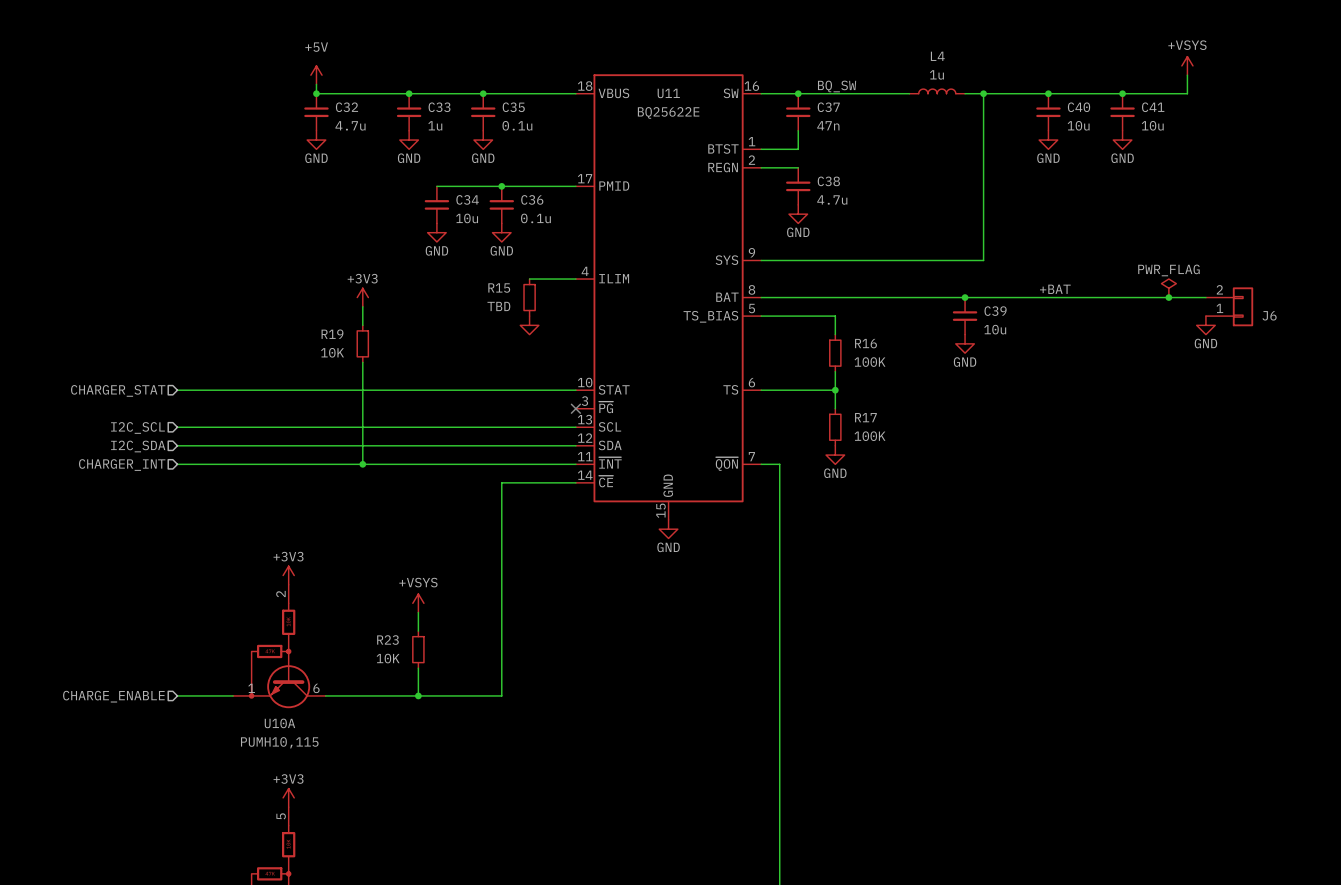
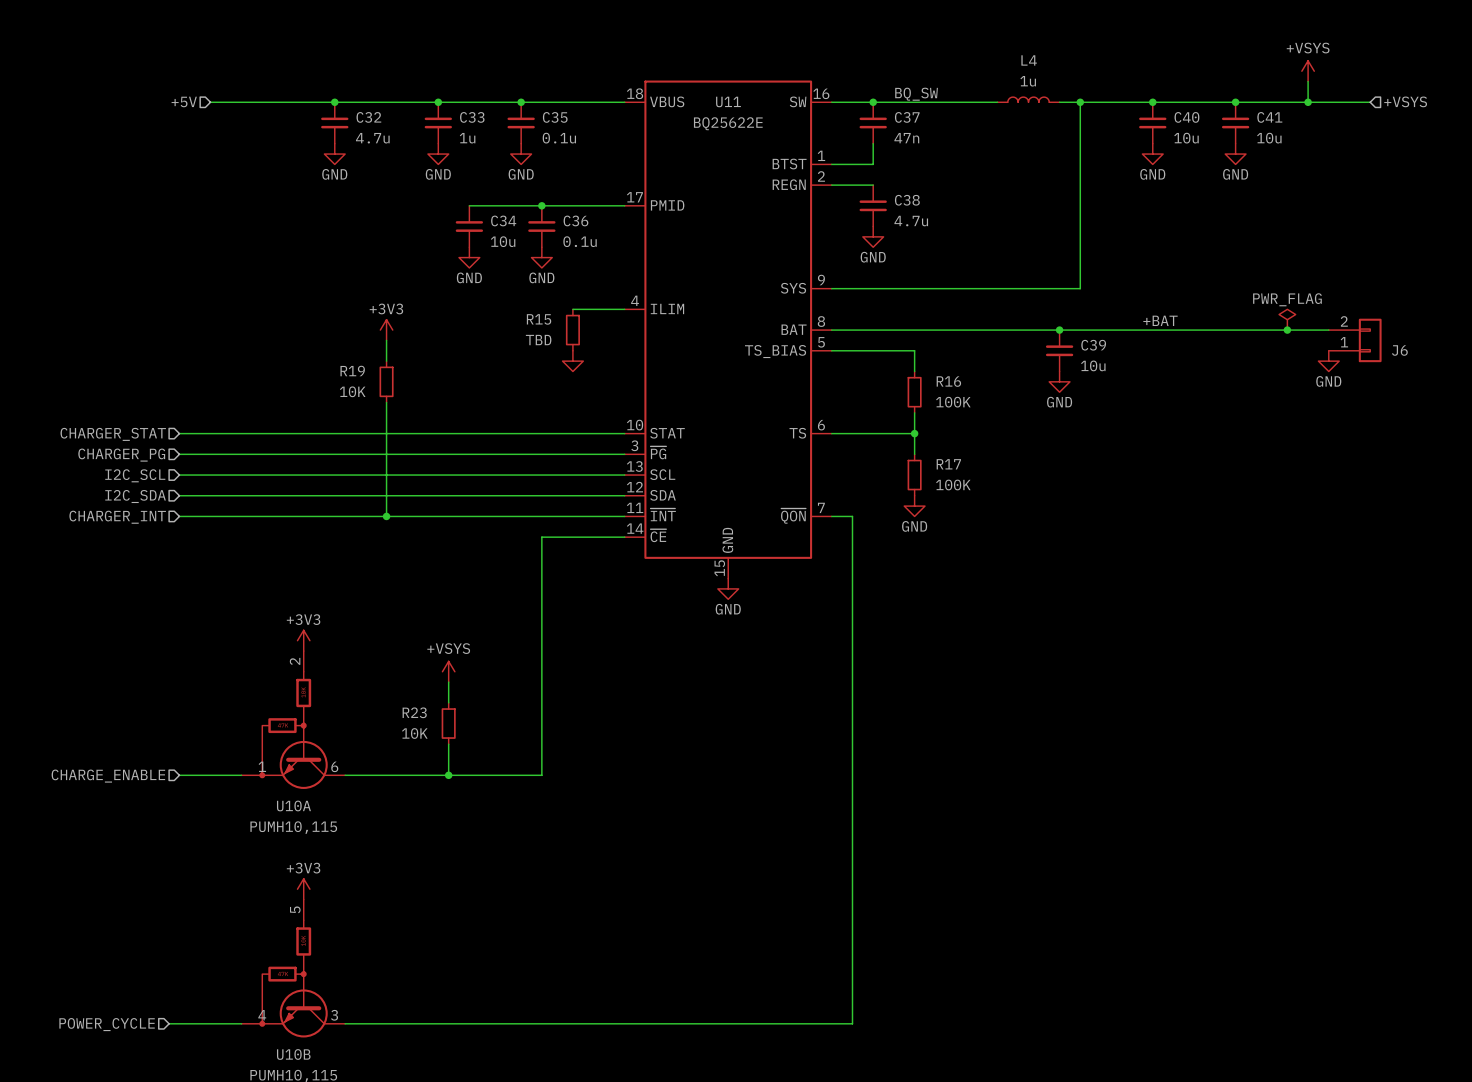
power symbol: +5V (316, 75) -> none
wire: (316, 84) (316, 93) -> (210, 102) (334, 102)
hierarchical label: none -> +5V (184, 101)
wire: none -> (1308, 102) (1370, 102)
junction: none -> (1308, 102)
hierarchical label: none -> +VSYS (1405, 101)
wire: none -> (179, 454) (624, 454)
no-connect mark: (575, 408) -> none
hierarchical label: none -> CHARGER_PG (121, 455)

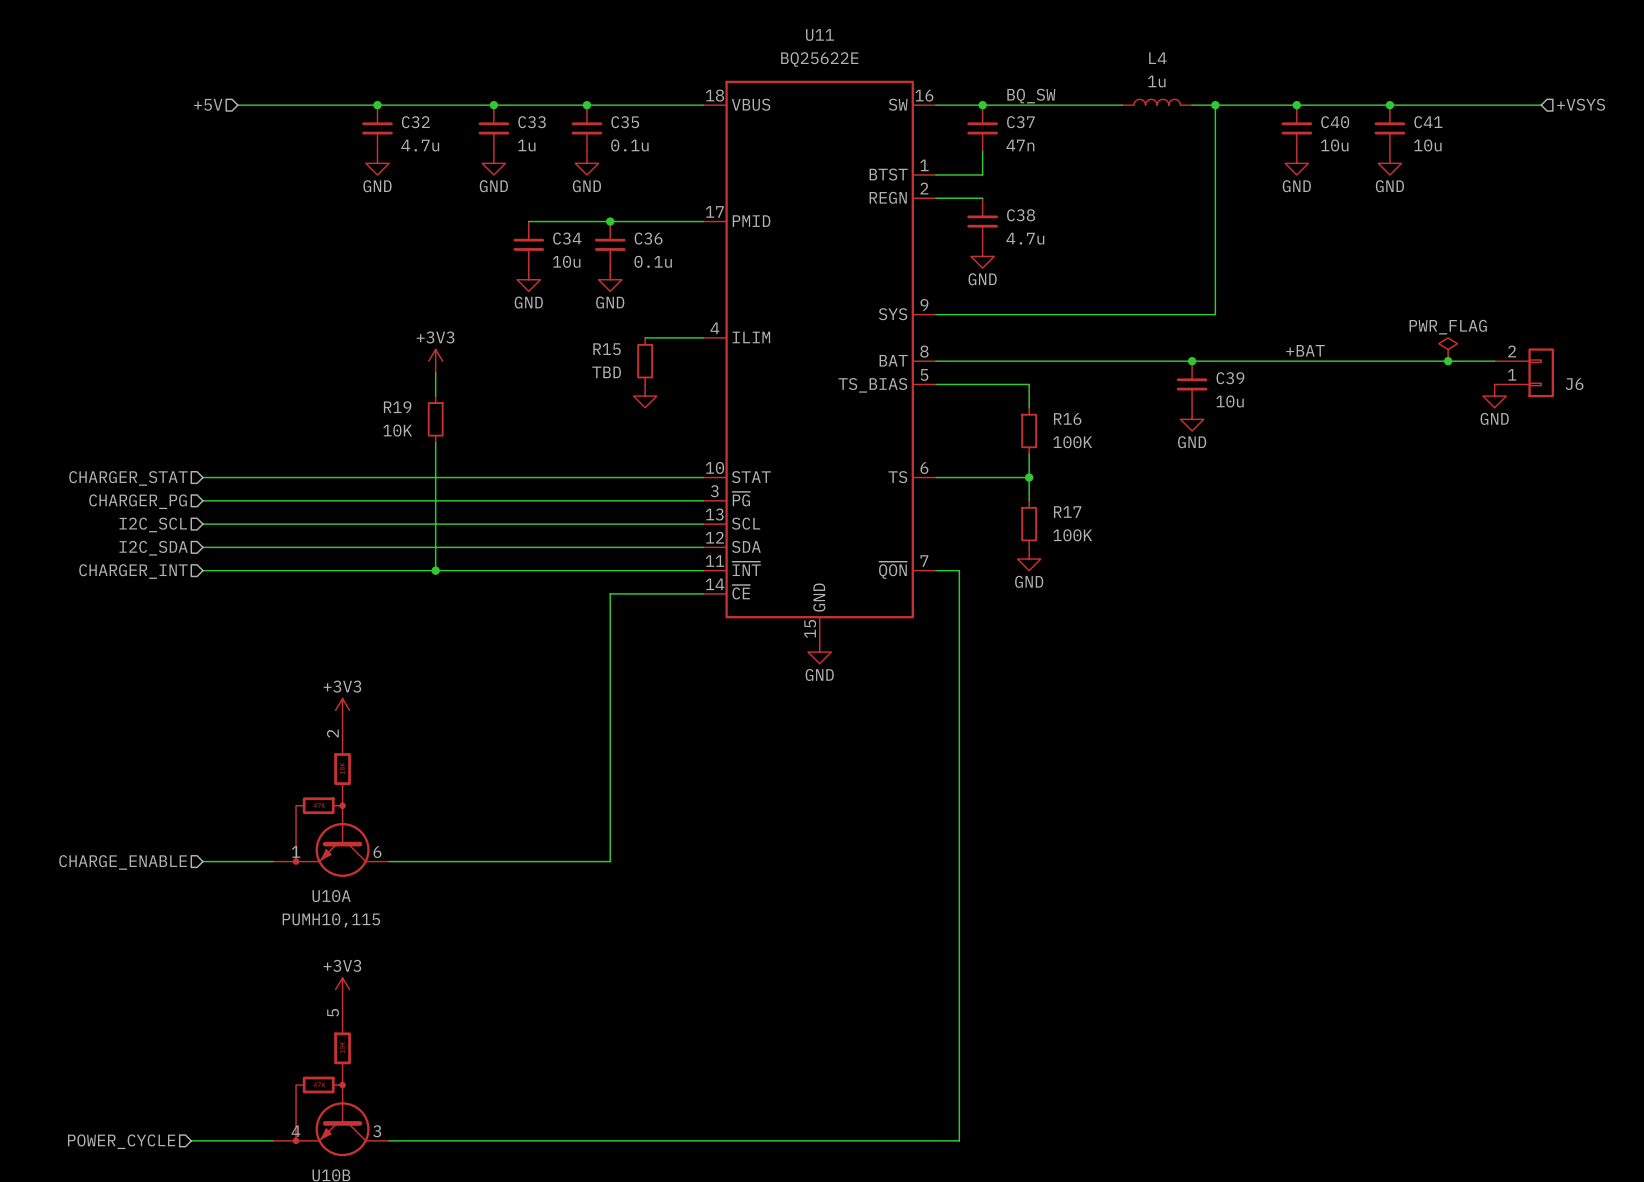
power symbol: +VSYS (1308, 71) -> none
wire: (1308, 81) (1308, 102) -> none
U11 name position: U11 (728, 101) -> U11 (819, 35)
junction: (1308, 102) -> none
U11 value position: BQ25622E (728, 123) -> BQ25622E (819, 59)
power symbol: +VSYS (448, 671) -> none
wire: (448, 682) (448, 702) -> none
R23: 10K (448, 723) -> none
wire: (448, 744) (448, 775) -> none
junction: (448, 775) -> none

